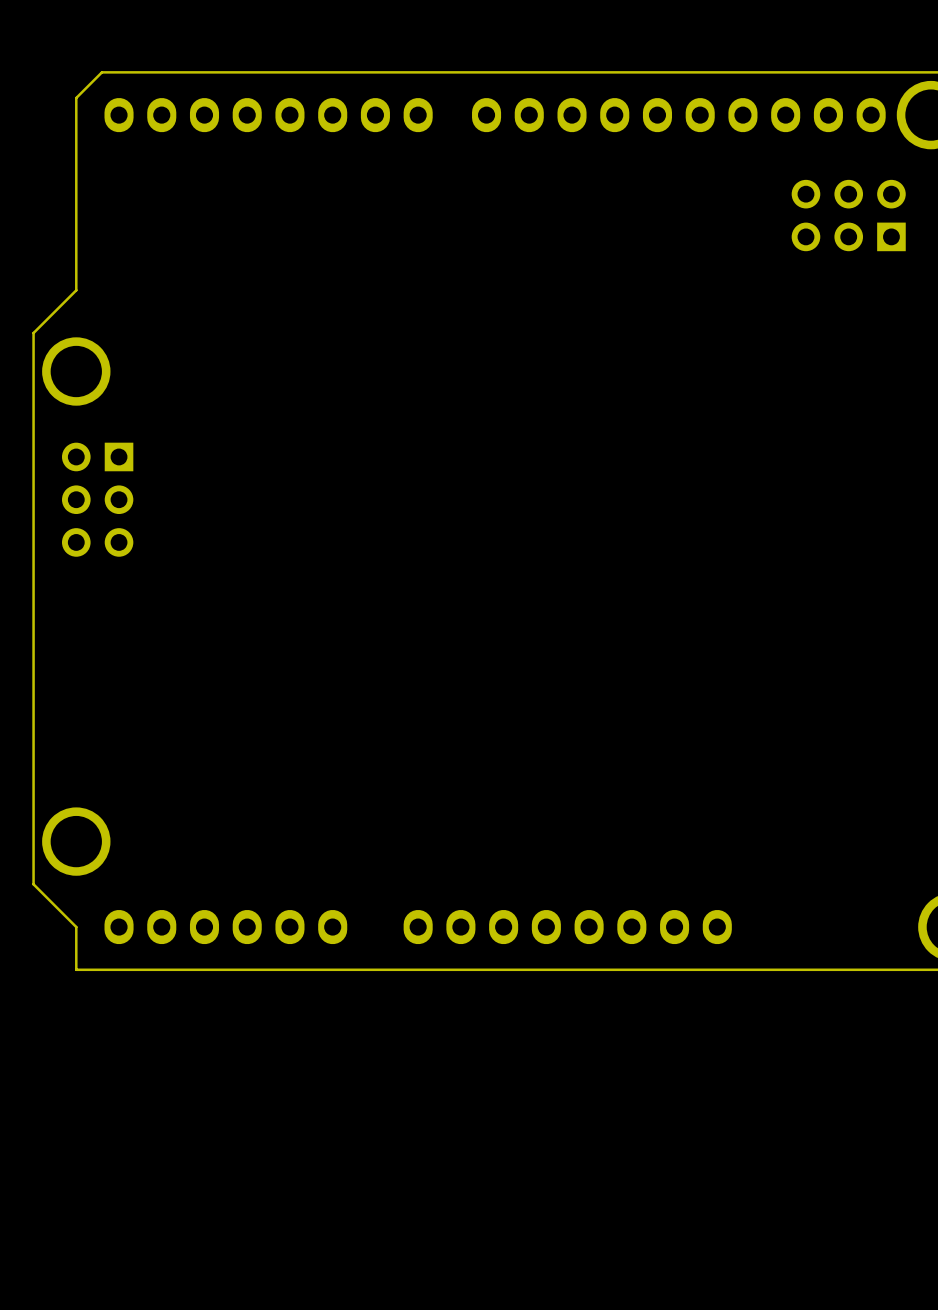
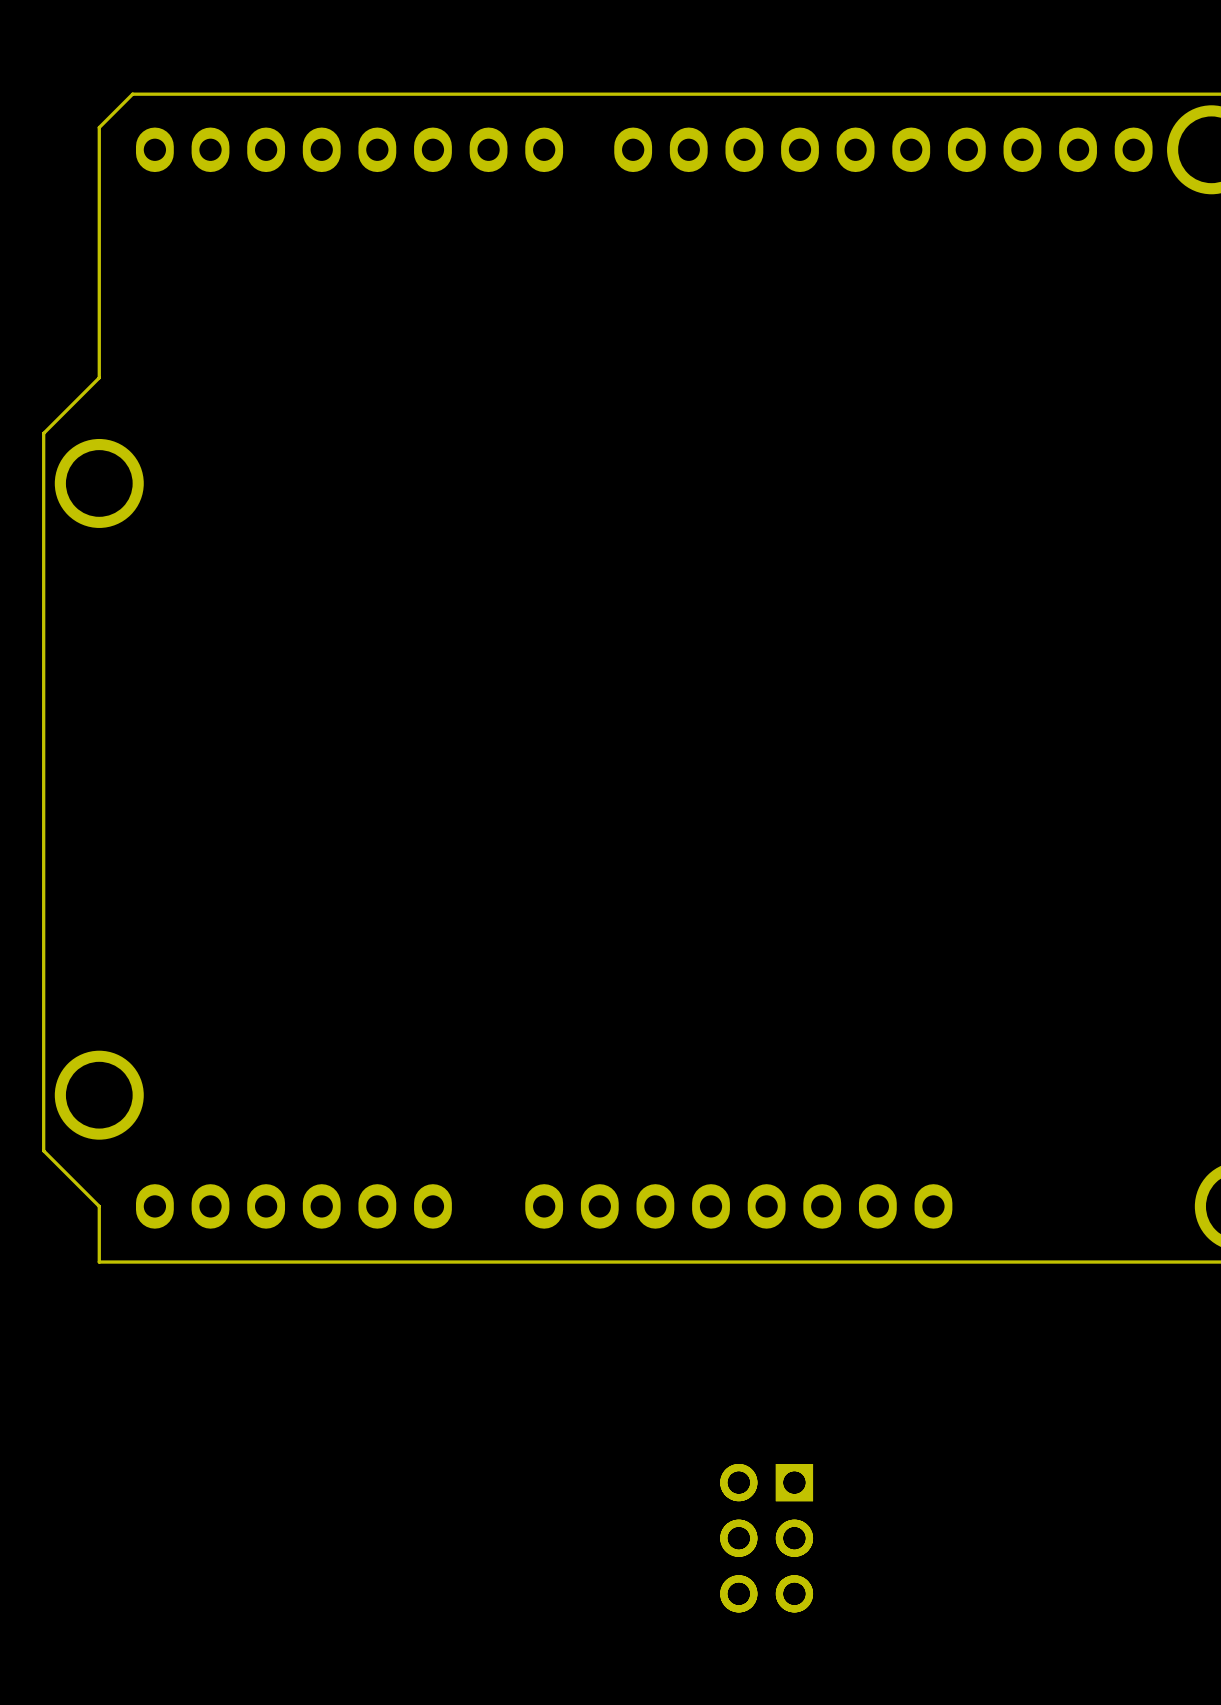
part: (848, 215) -> none
part: (97, 499) -> none
part: none -> (766, 1538)

